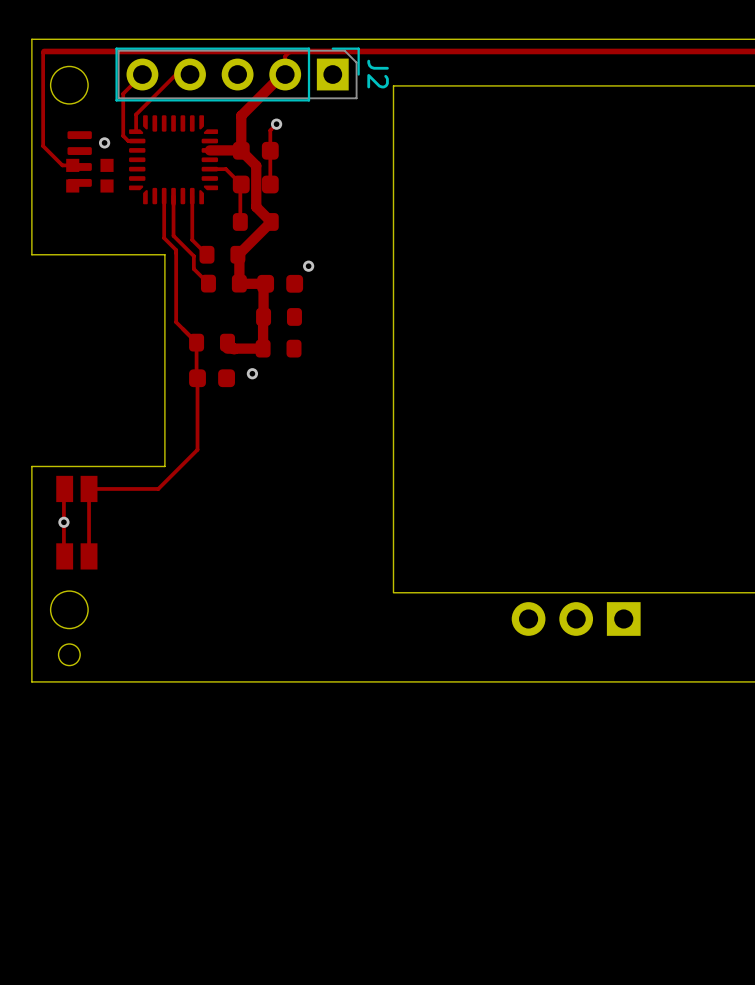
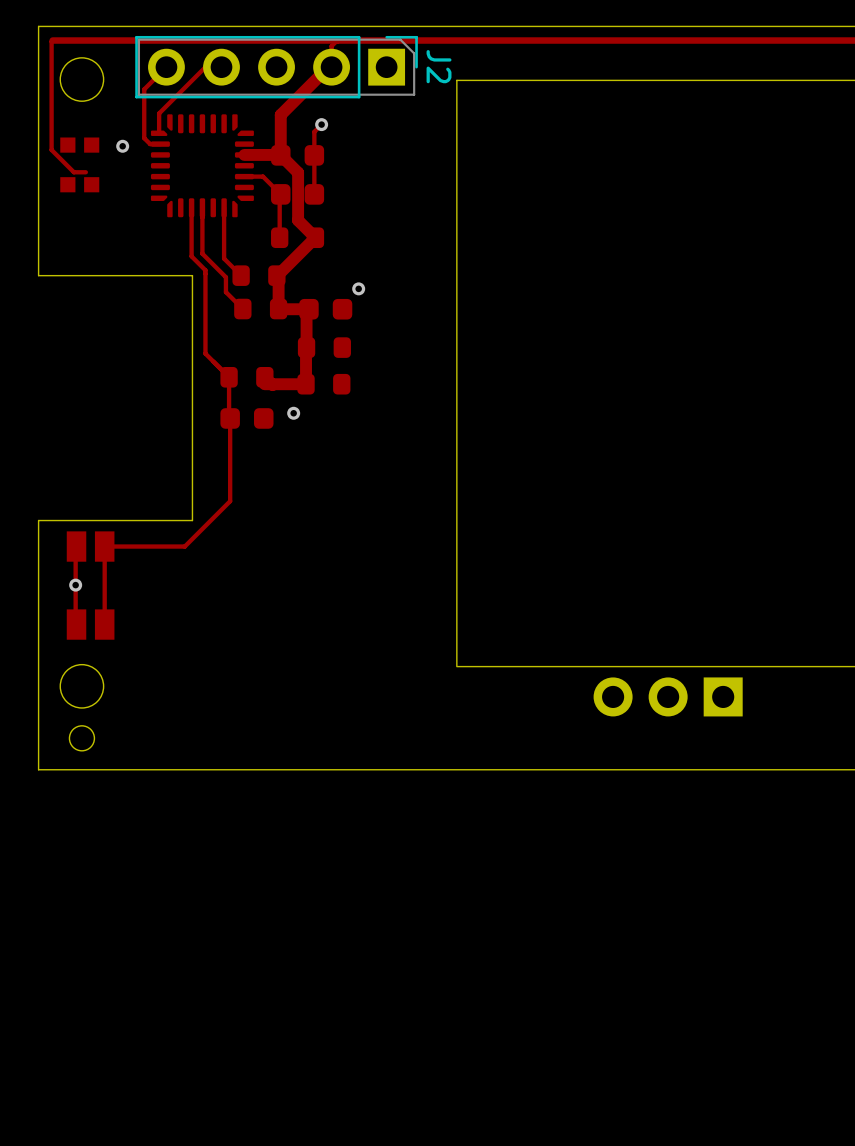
part: none -> (79, 164)
part: (89, 161) -> none

